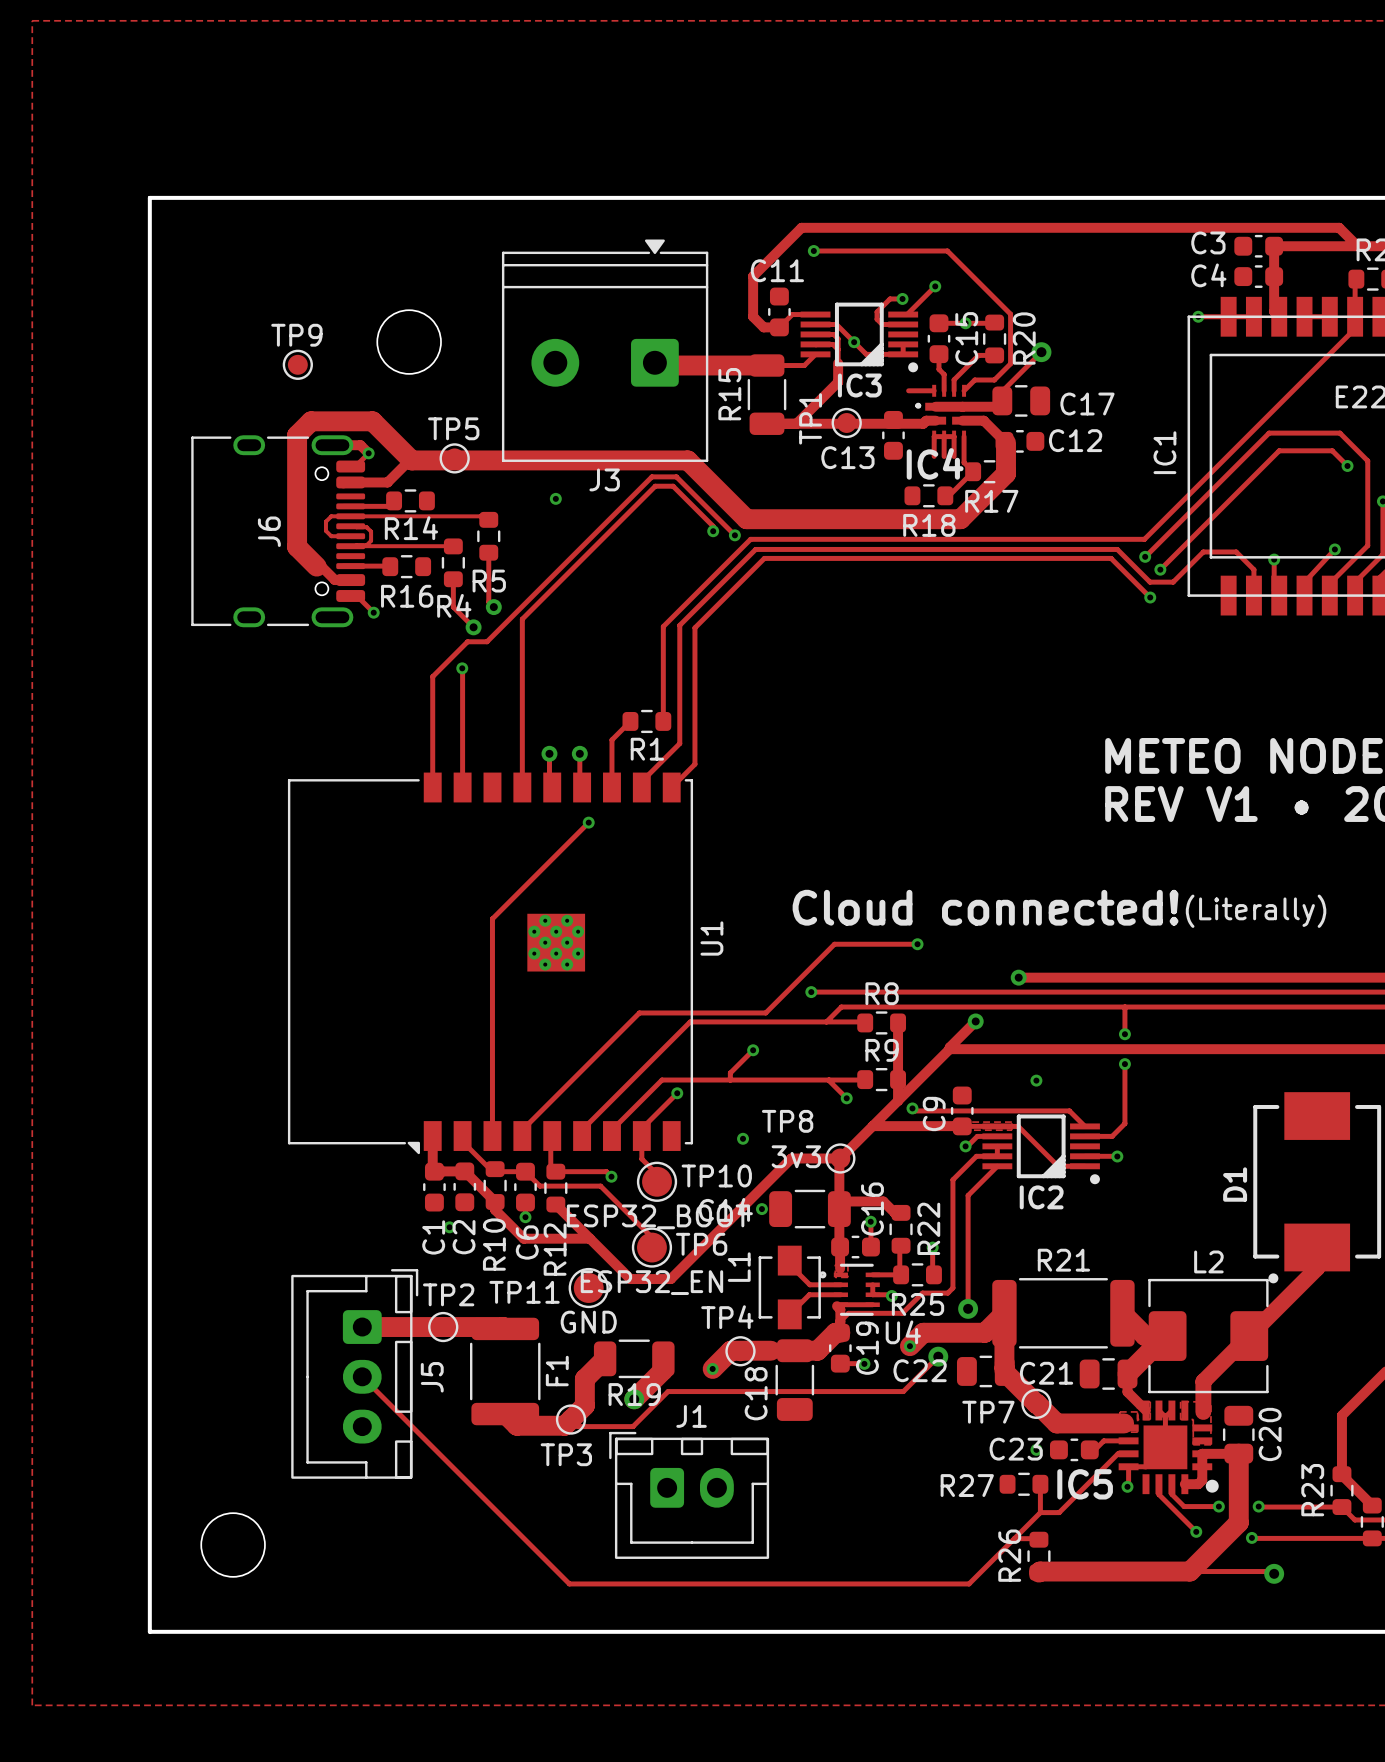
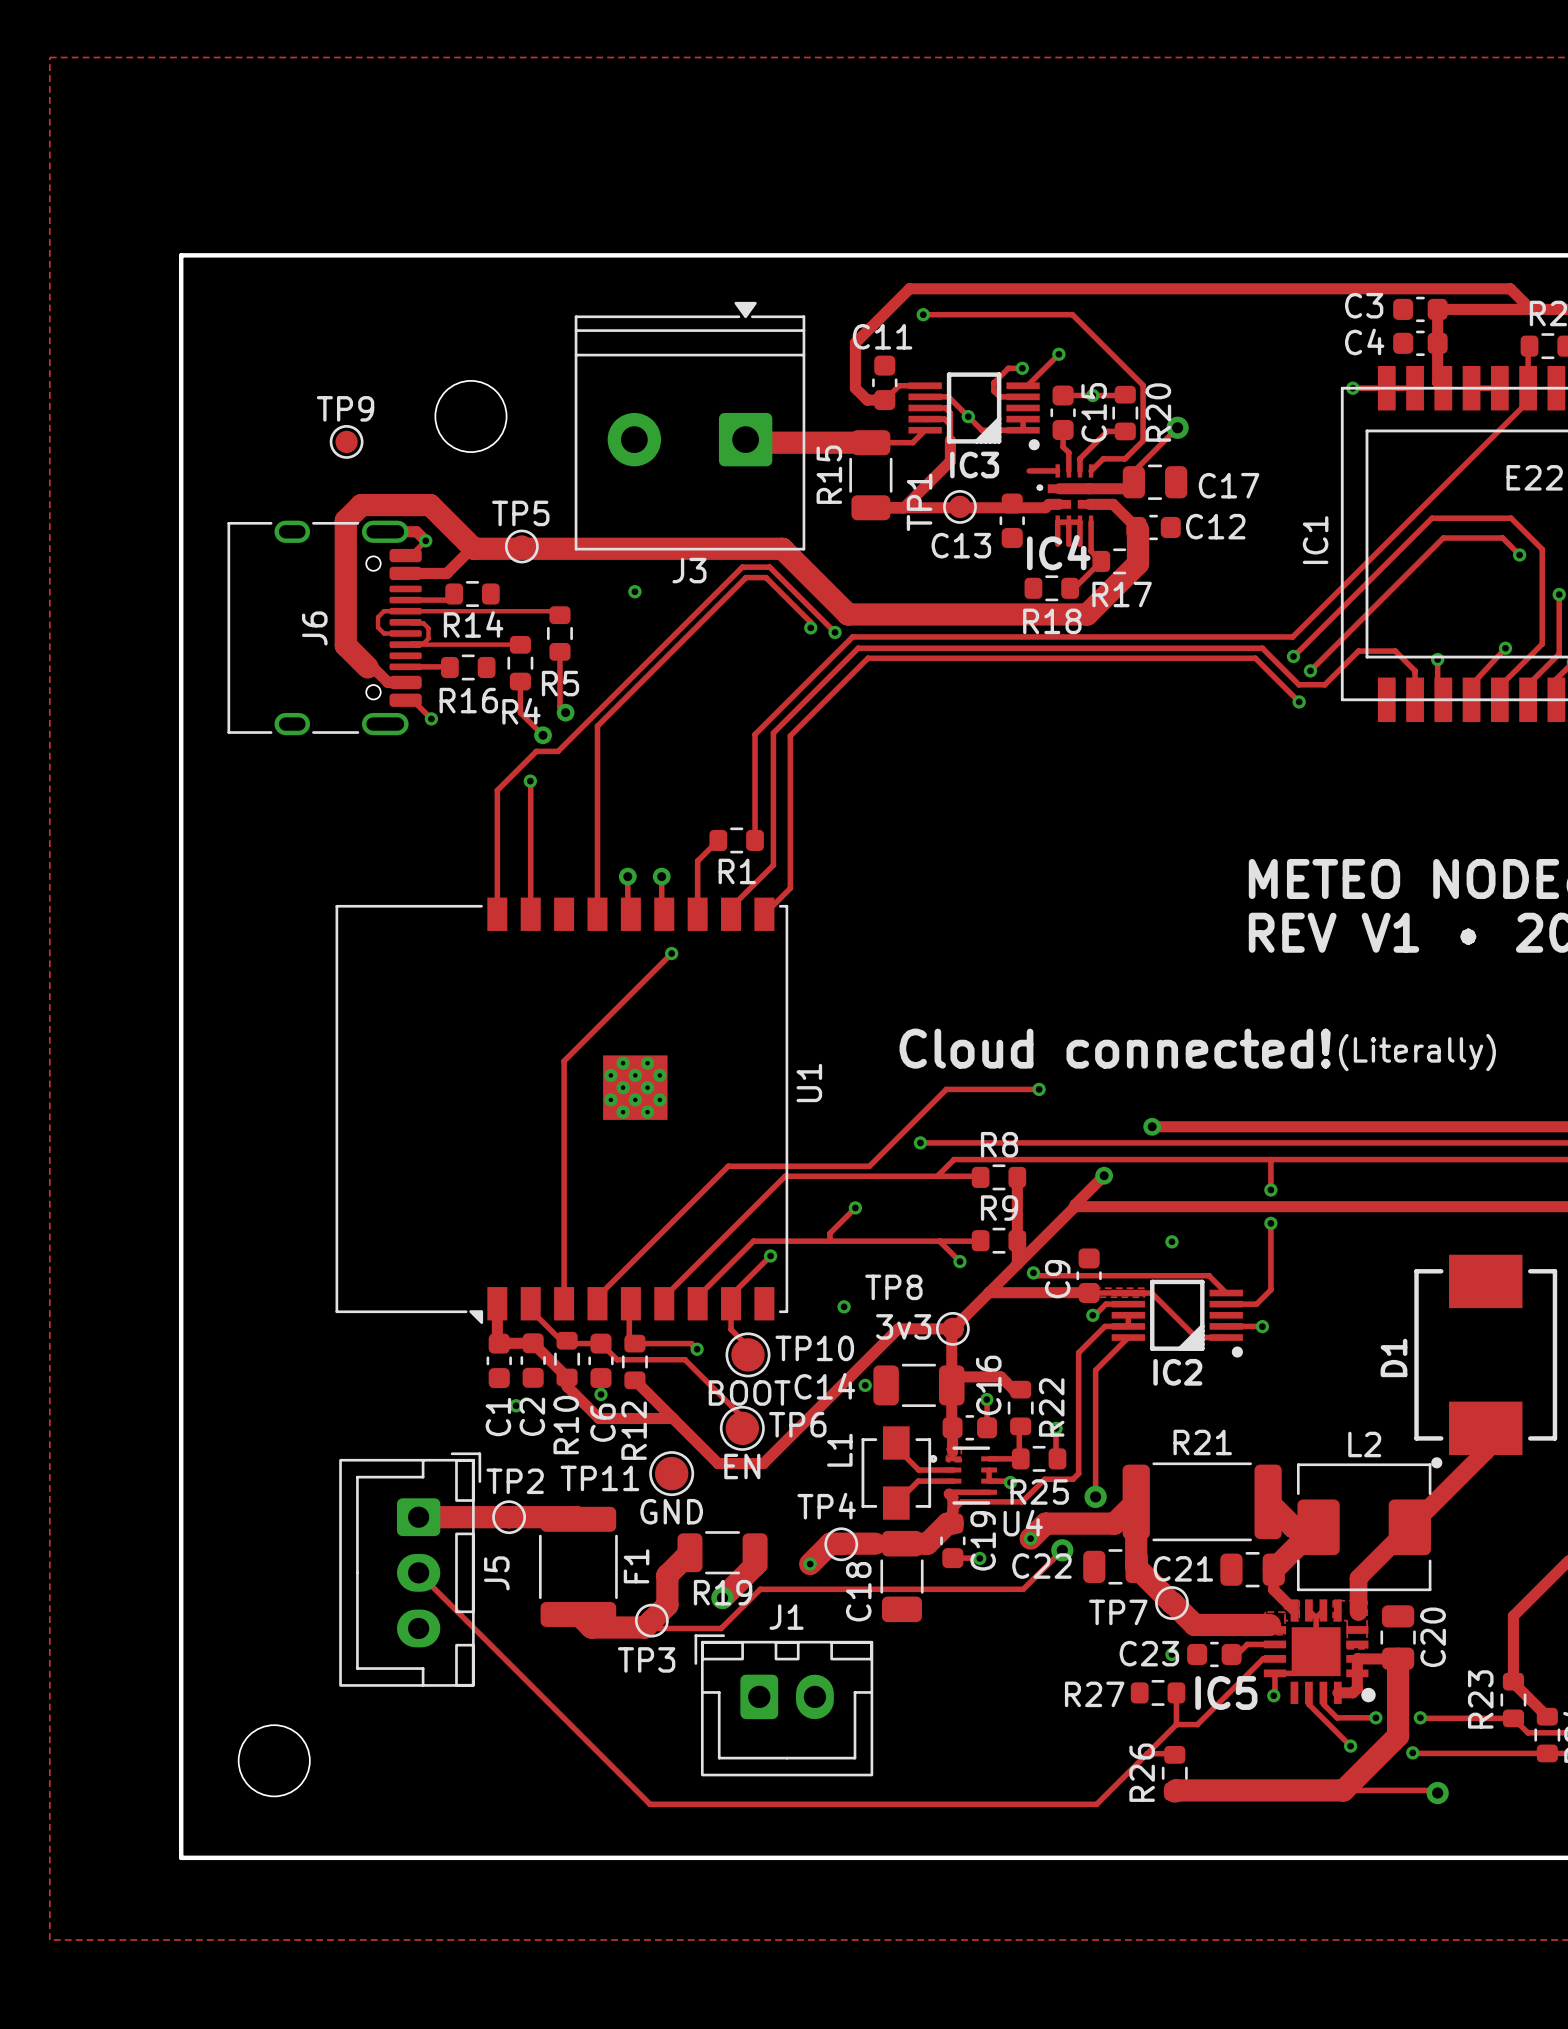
TP10 value: ESP32_BOOT (658, 1216) -> BOOT (749, 1393)
TP6 value: ESP32_EN (651, 1282) -> EN (742, 1466)

